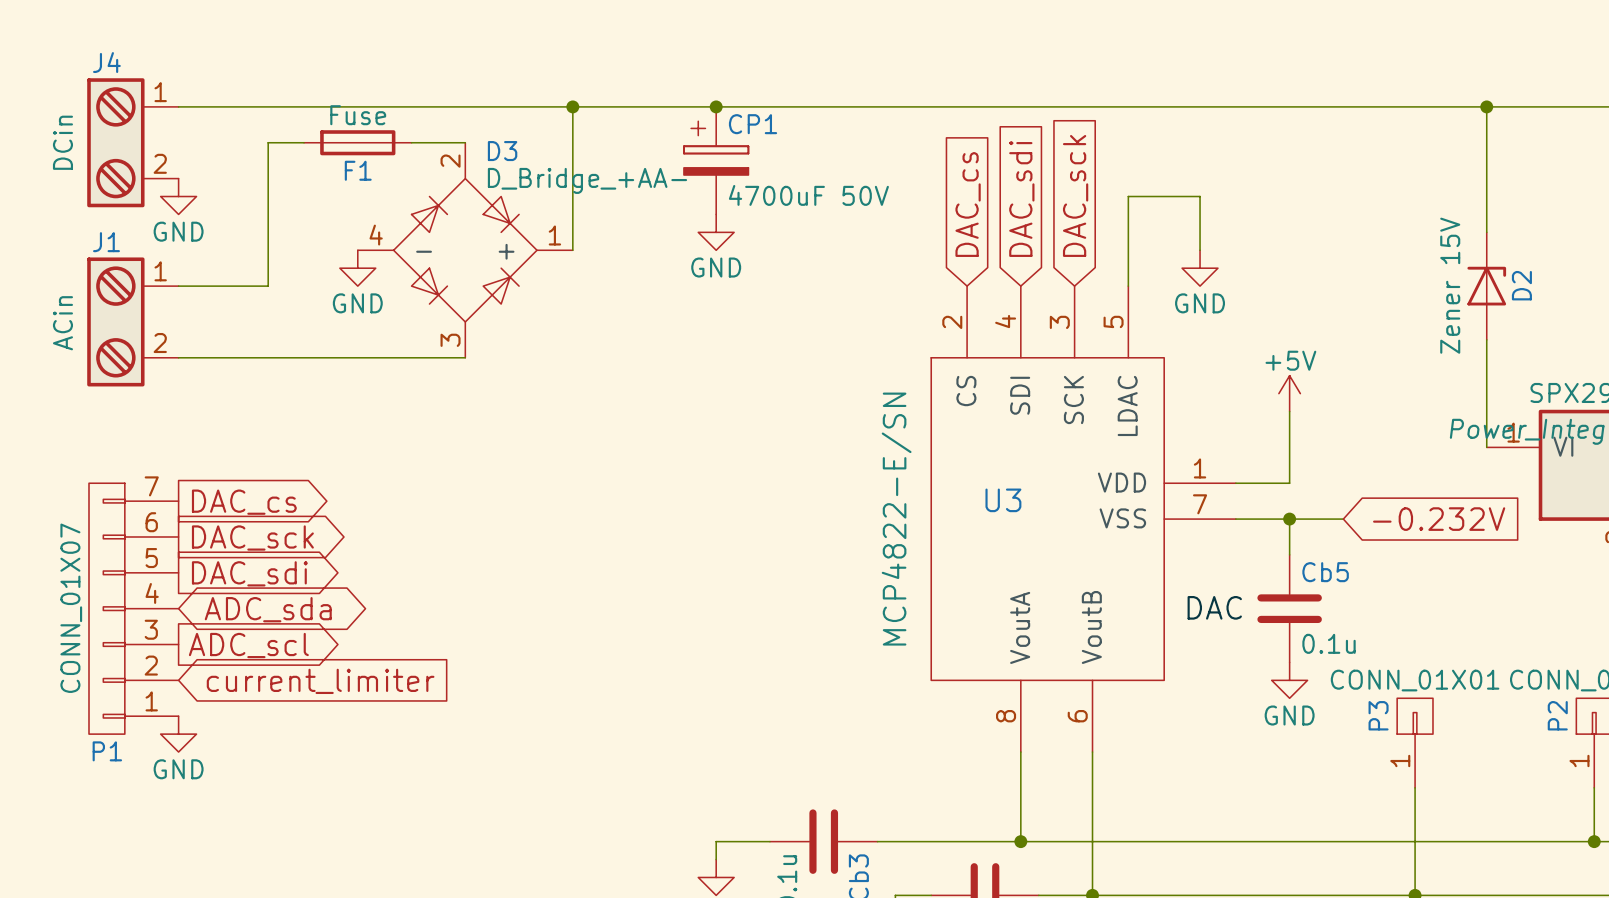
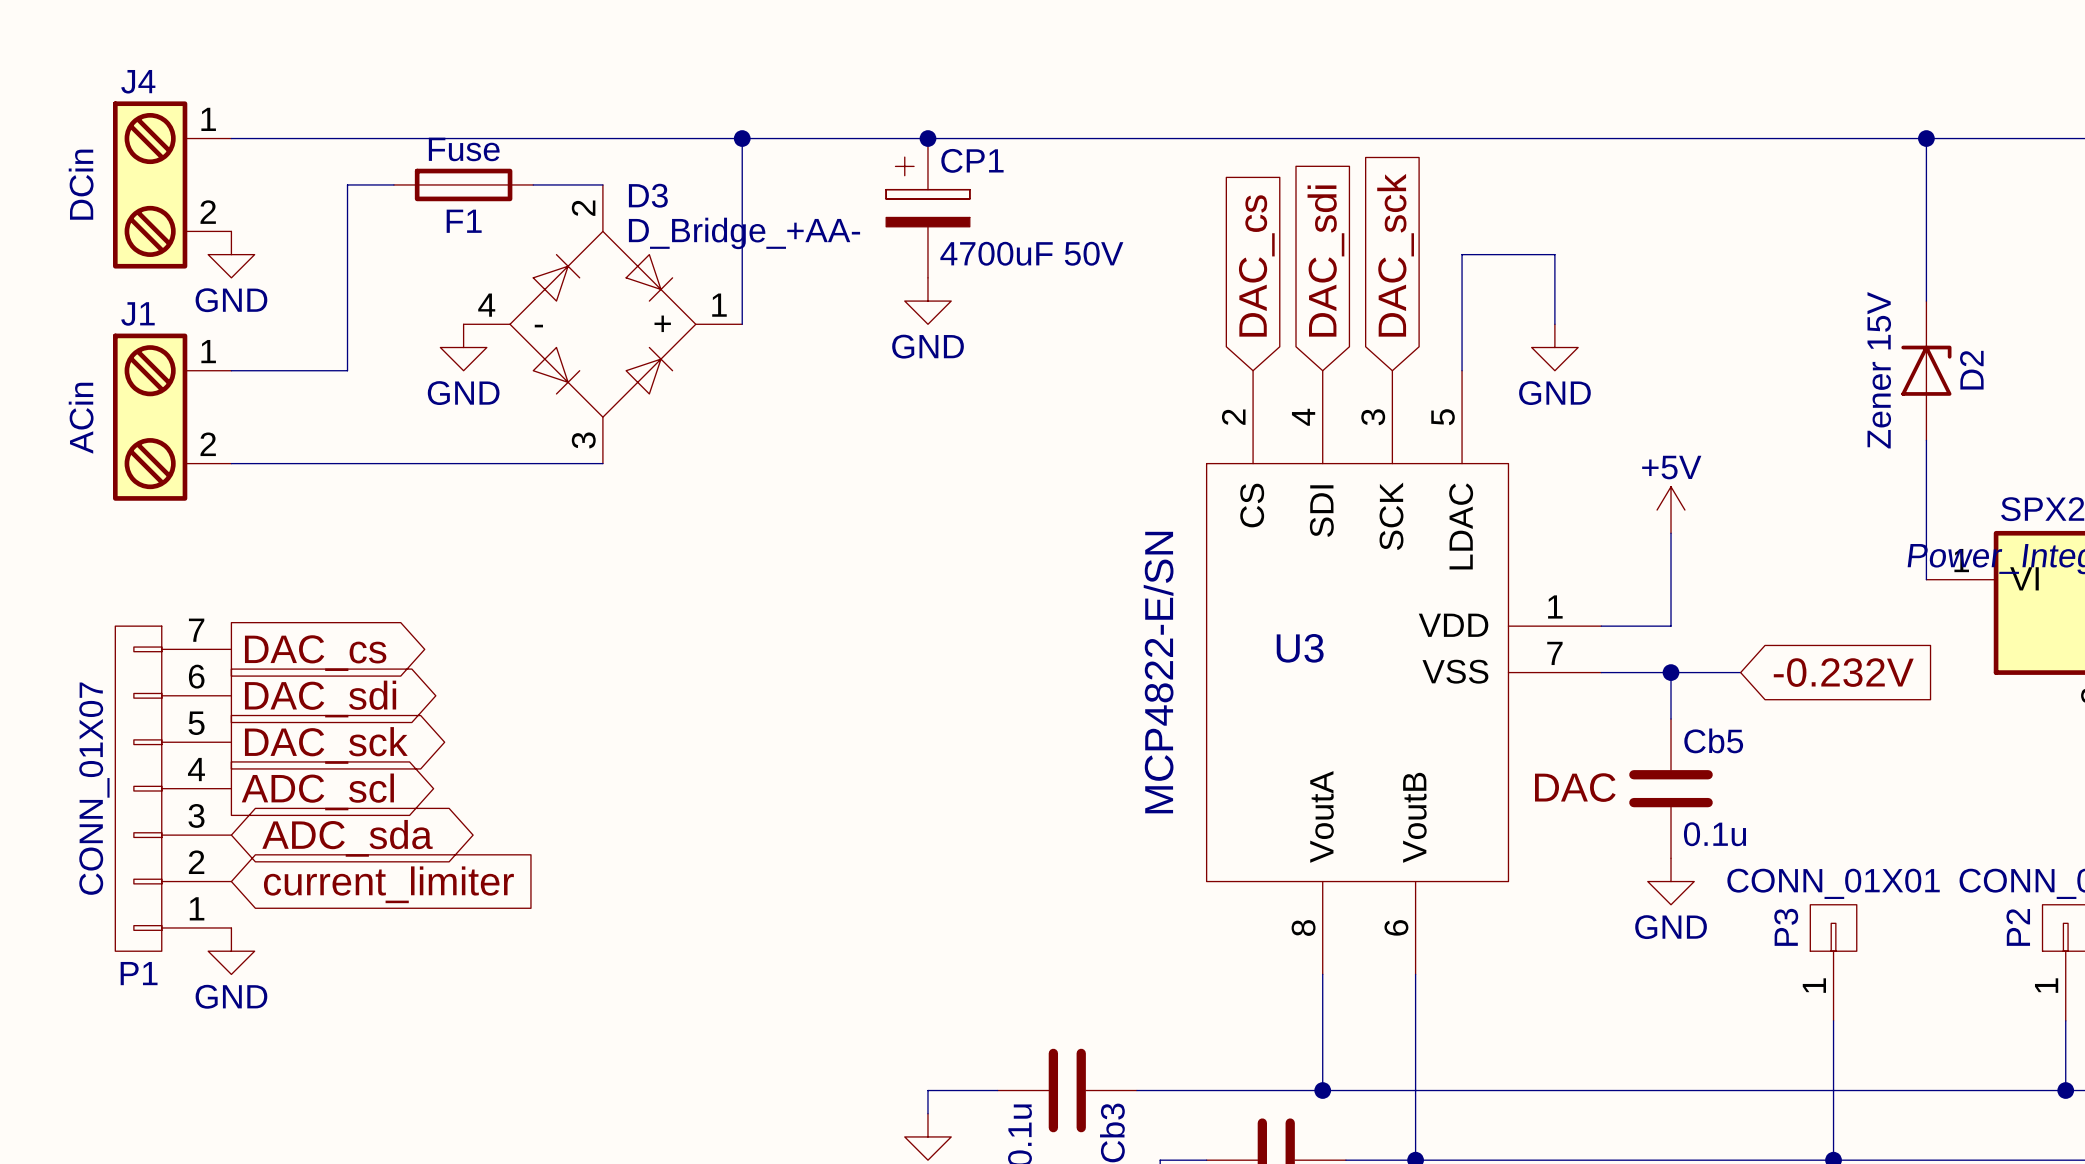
global label: DAC_sck (252, 538) -> DAC_sdi (320, 699)
global label: DAC_sdi (249, 573) -> DAC_sck (326, 745)
global label shape: bidirectional (268, 609) -> output (317, 791)
global label: ADC_sda (268, 609) -> ADC_scl (317, 791)
global label shape: output (248, 645) -> bidirectional (347, 838)
global label: ADC_scl (248, 645) -> ADC_sda (347, 838)

